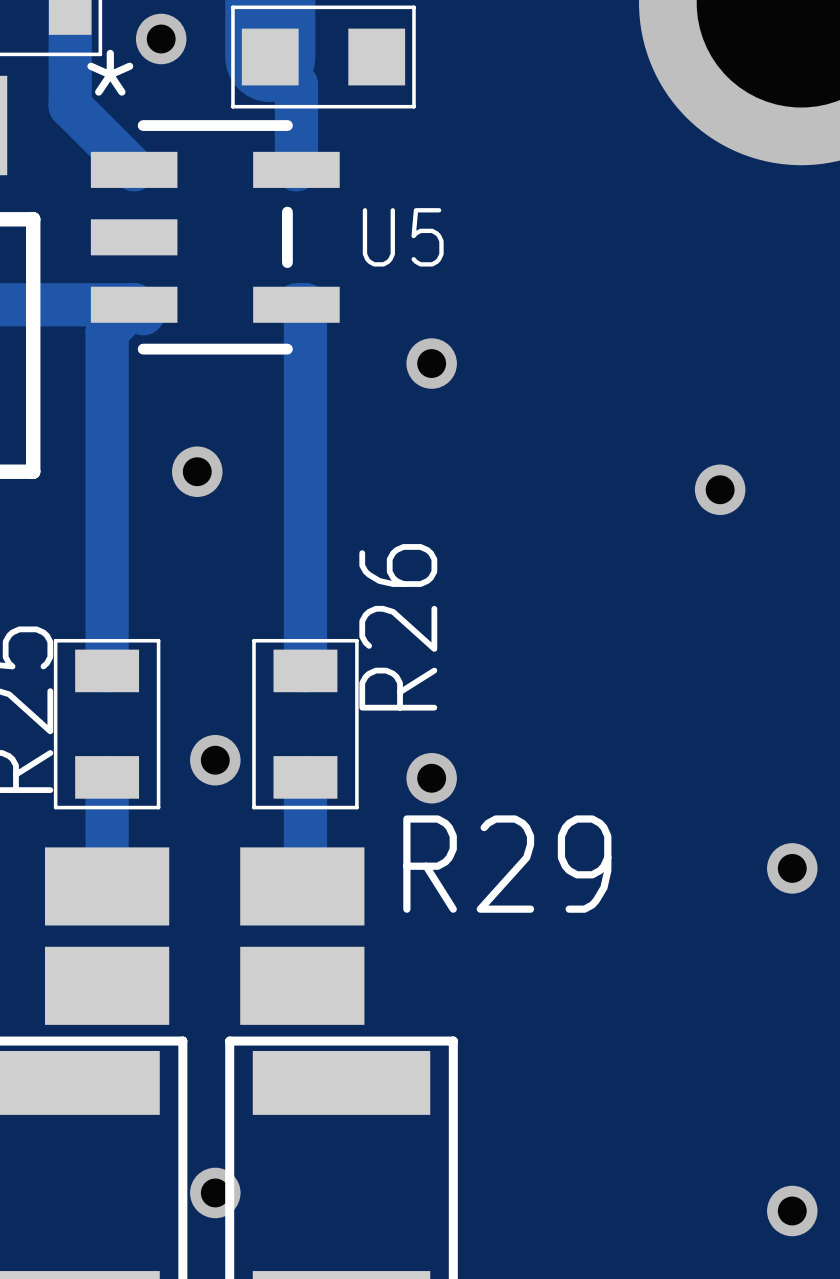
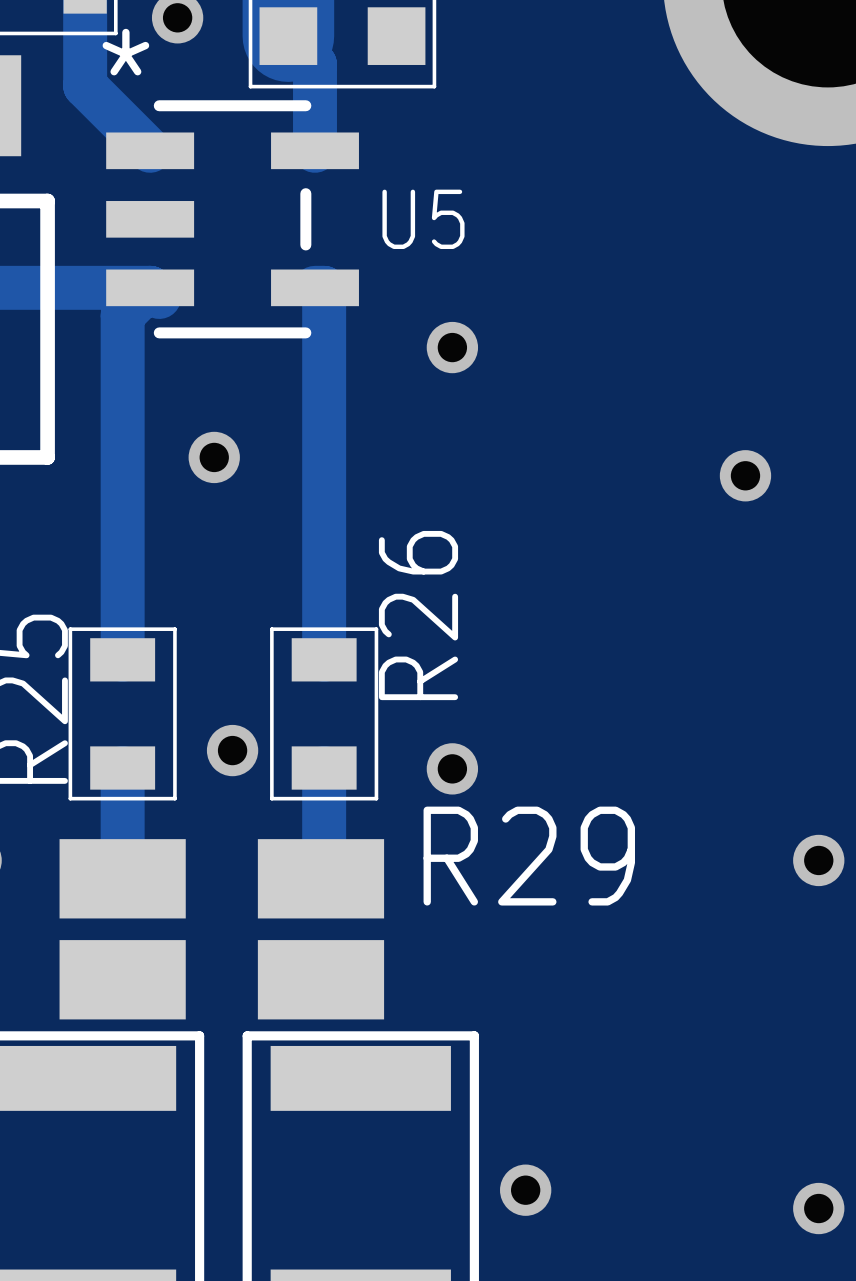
via position: (215, 1192) -> (525, 1190)

